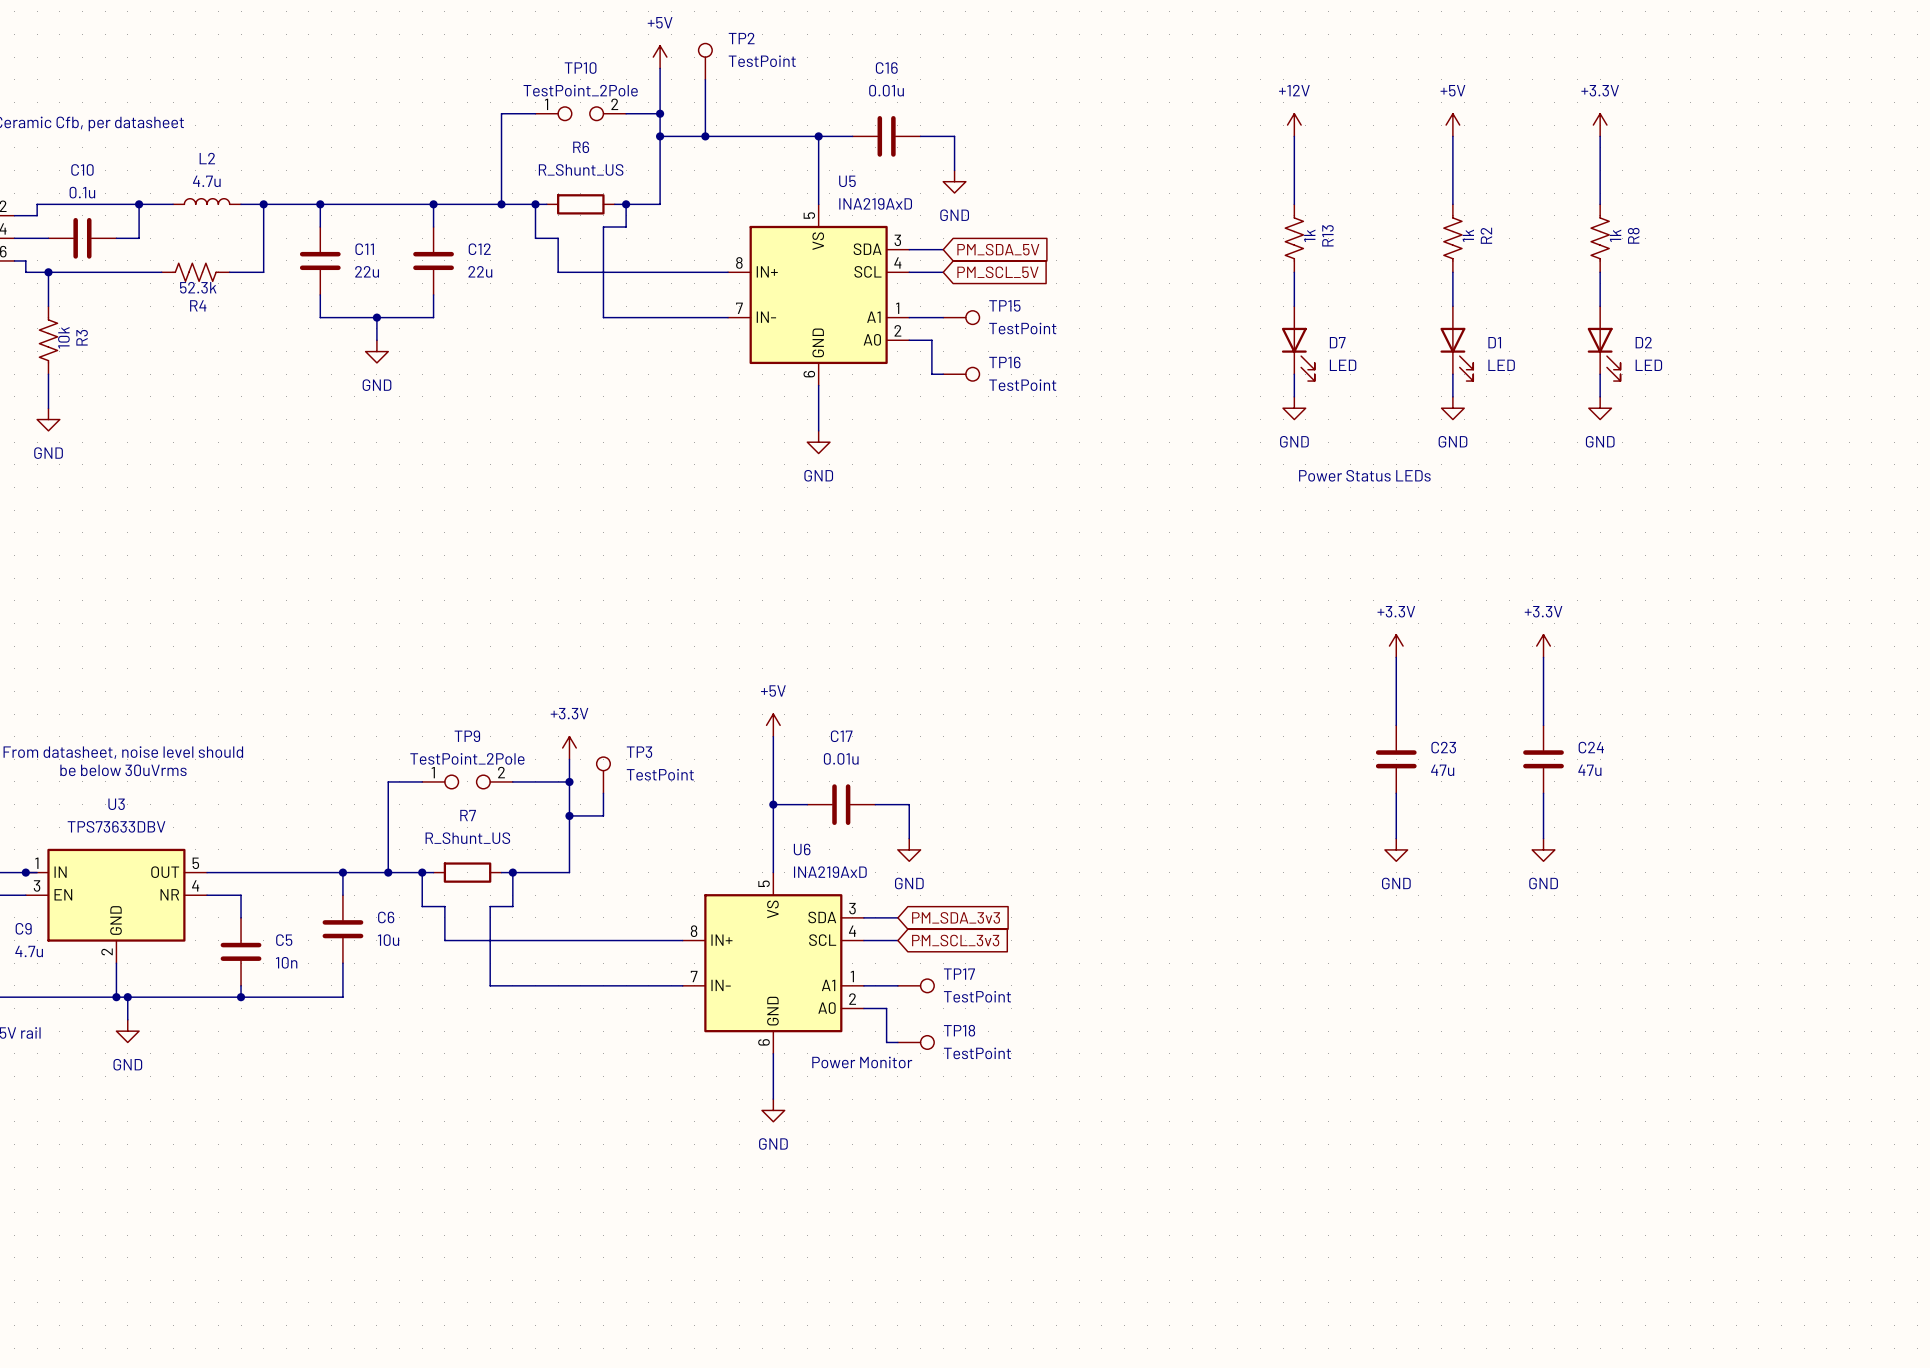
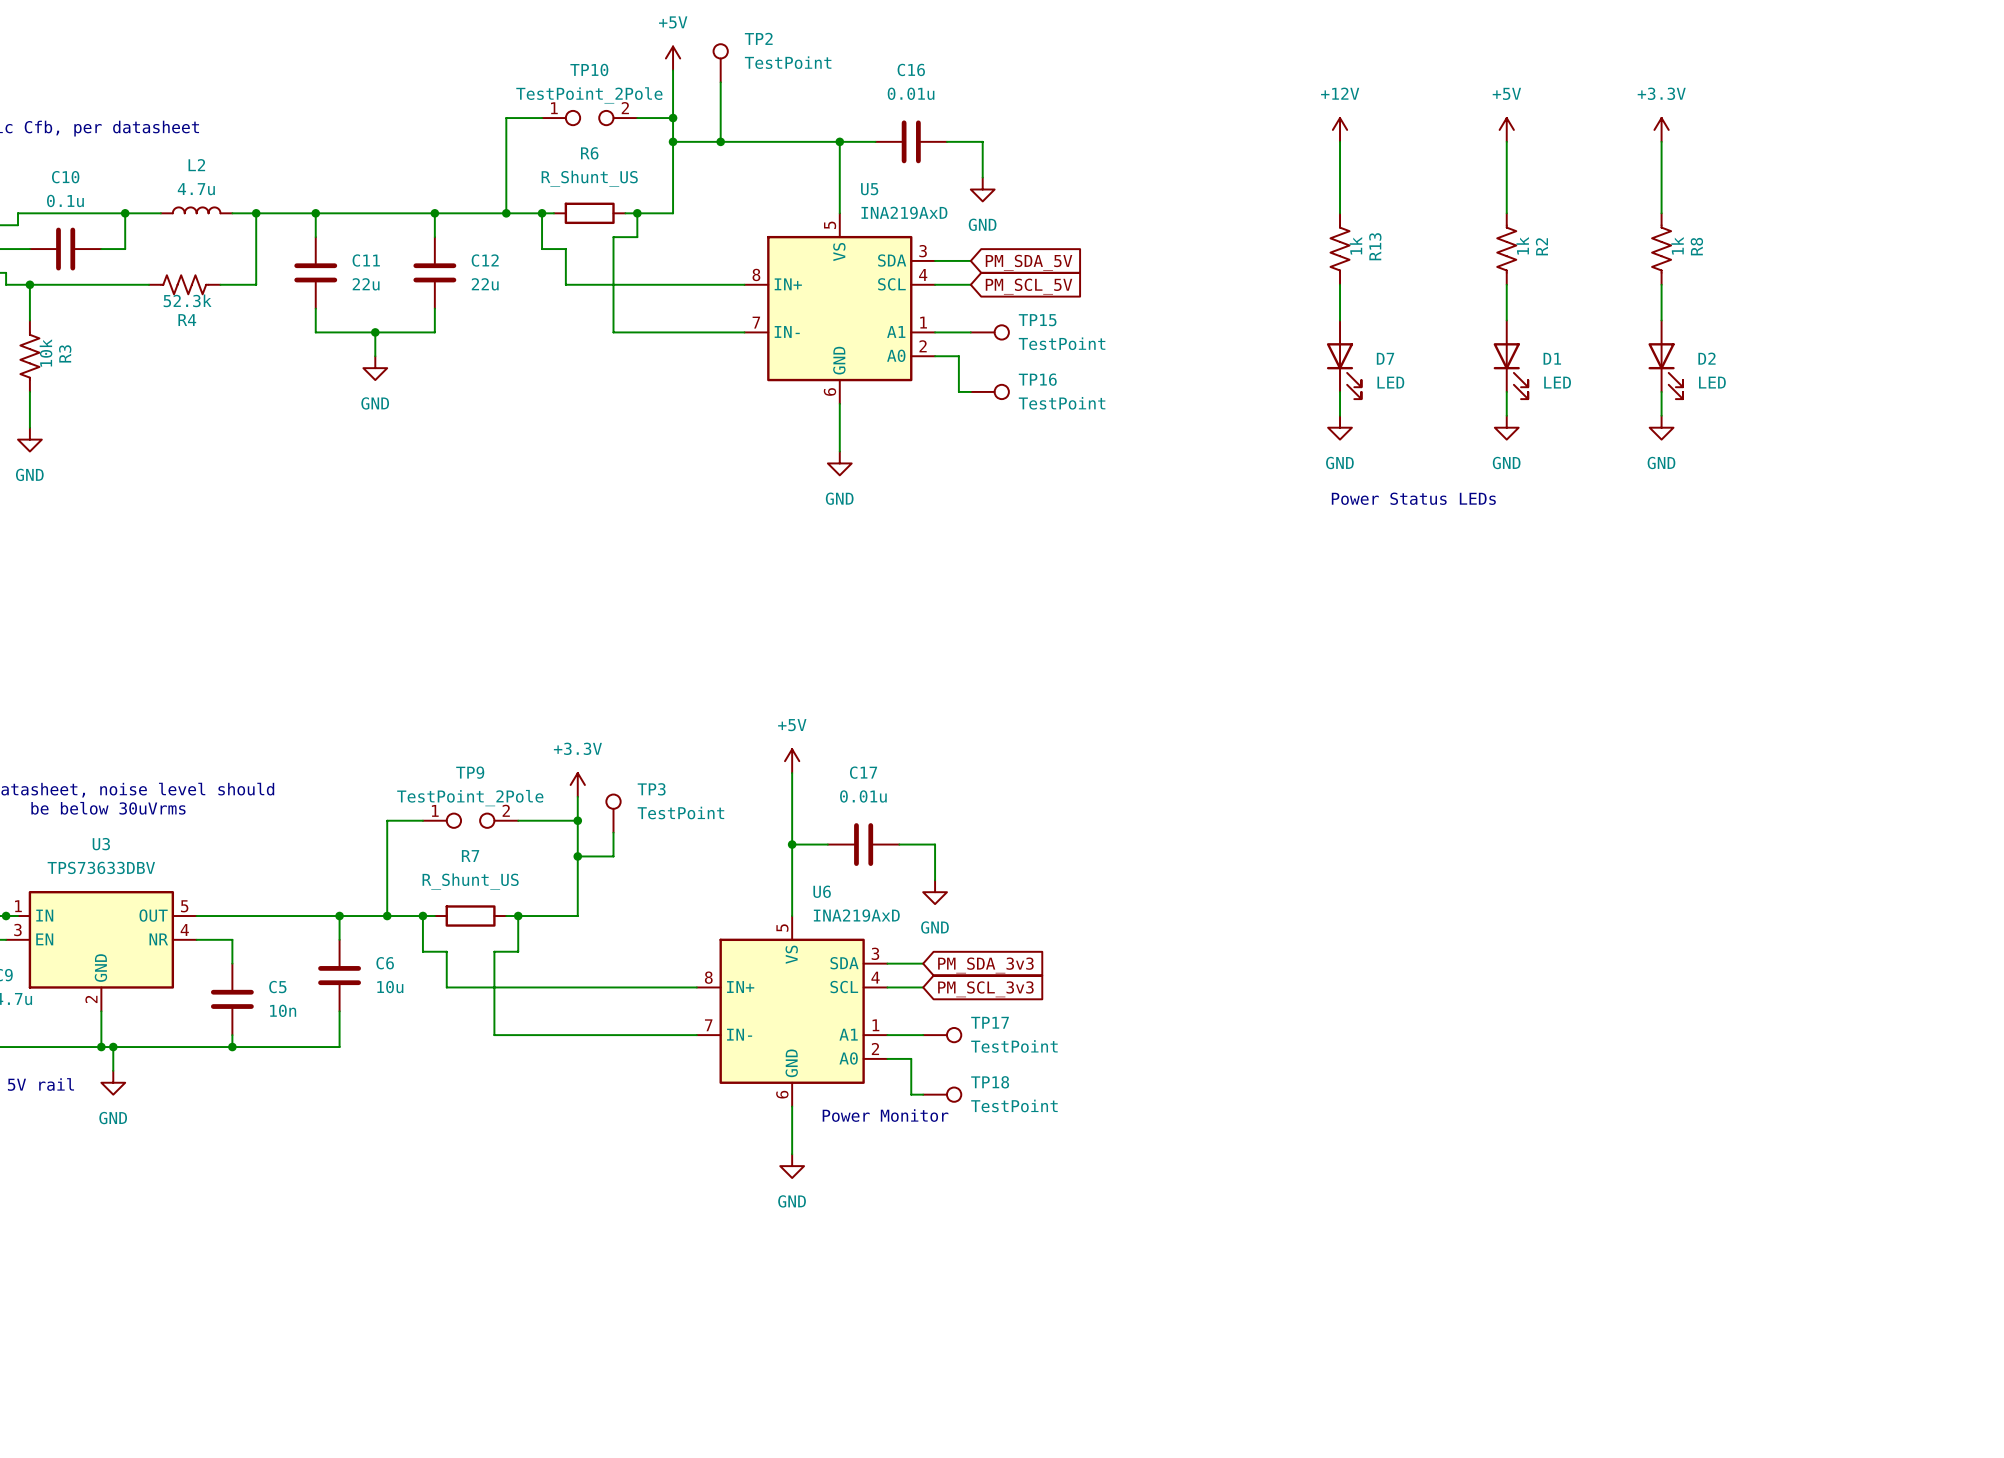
power symbol: +3.3V (1396, 646) -> none
power symbol: +3.3V (1543, 646) -> none
wire: (1396, 657) (1396, 725) -> none
wire: (1543, 657) (1543, 725) -> none
C23: 47u (1396, 759) -> none
C24: 47u (1543, 759) -> none
wire: (1396, 793) (1396, 838) -> none
wire: (1543, 793) (1543, 838) -> none
power symbol: GND (1396, 849) -> none
power symbol: GND (1543, 849) -> none

